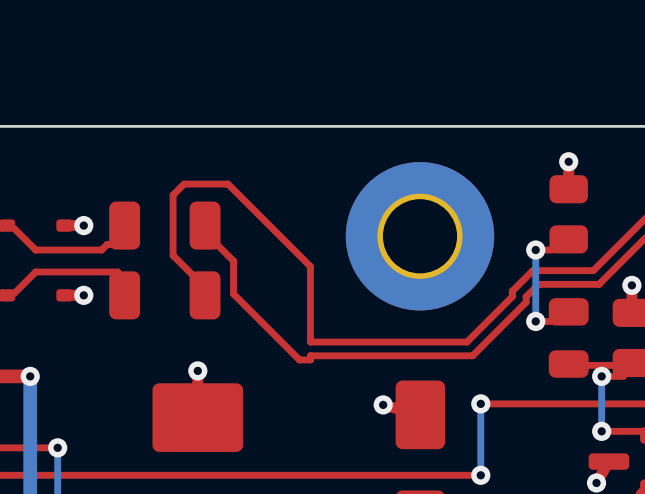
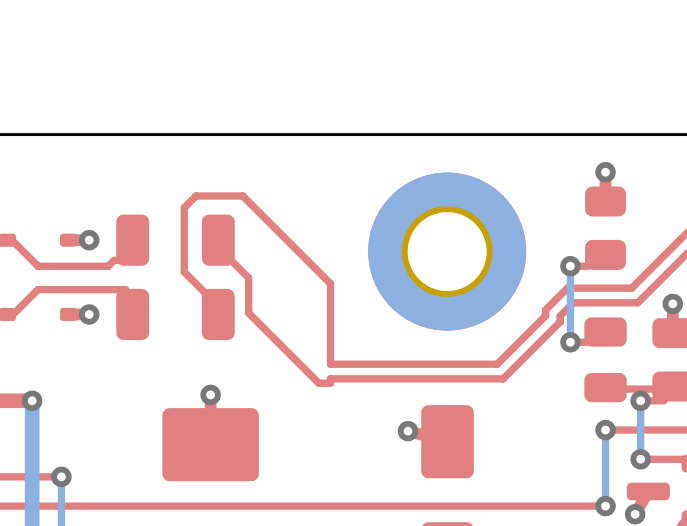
bottom track: (480, 403) (480, 475) -> (605, 430) (605, 506)
via: (480, 403) -> none
top track: (568, 403) (480, 403) -> (605, 506) (511, 506)
via: none -> (605, 430)
via: (480, 475) -> none
via: none -> (605, 506)

